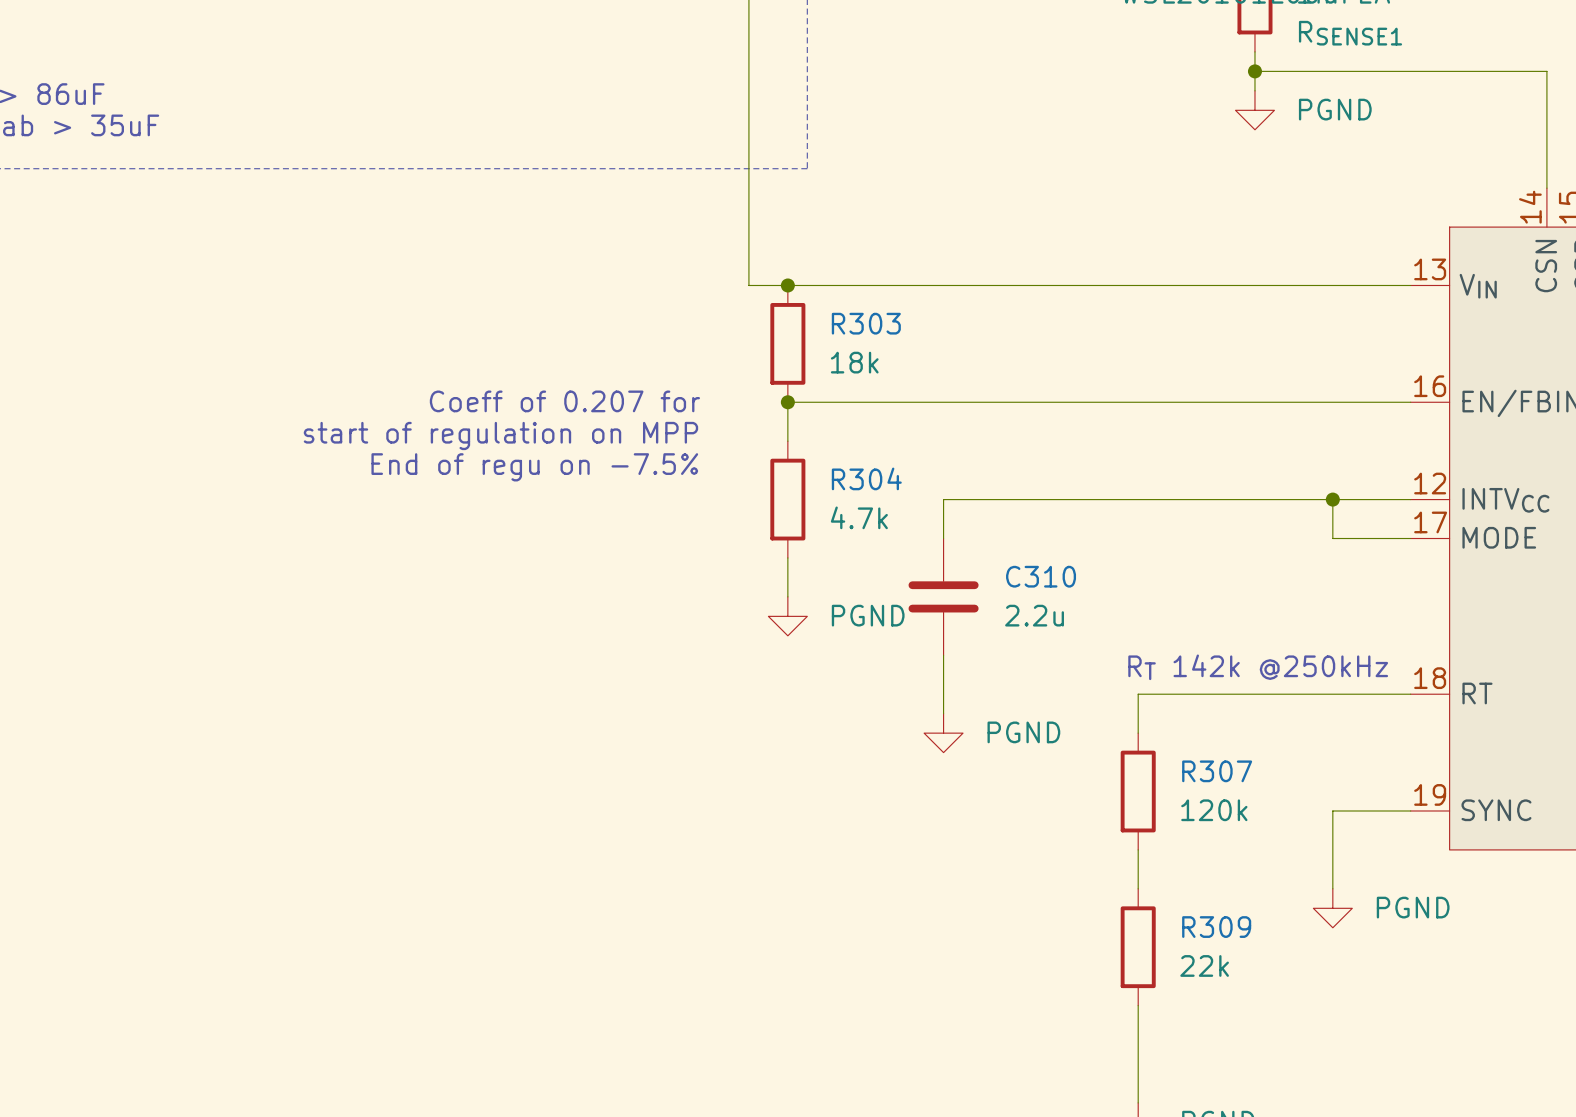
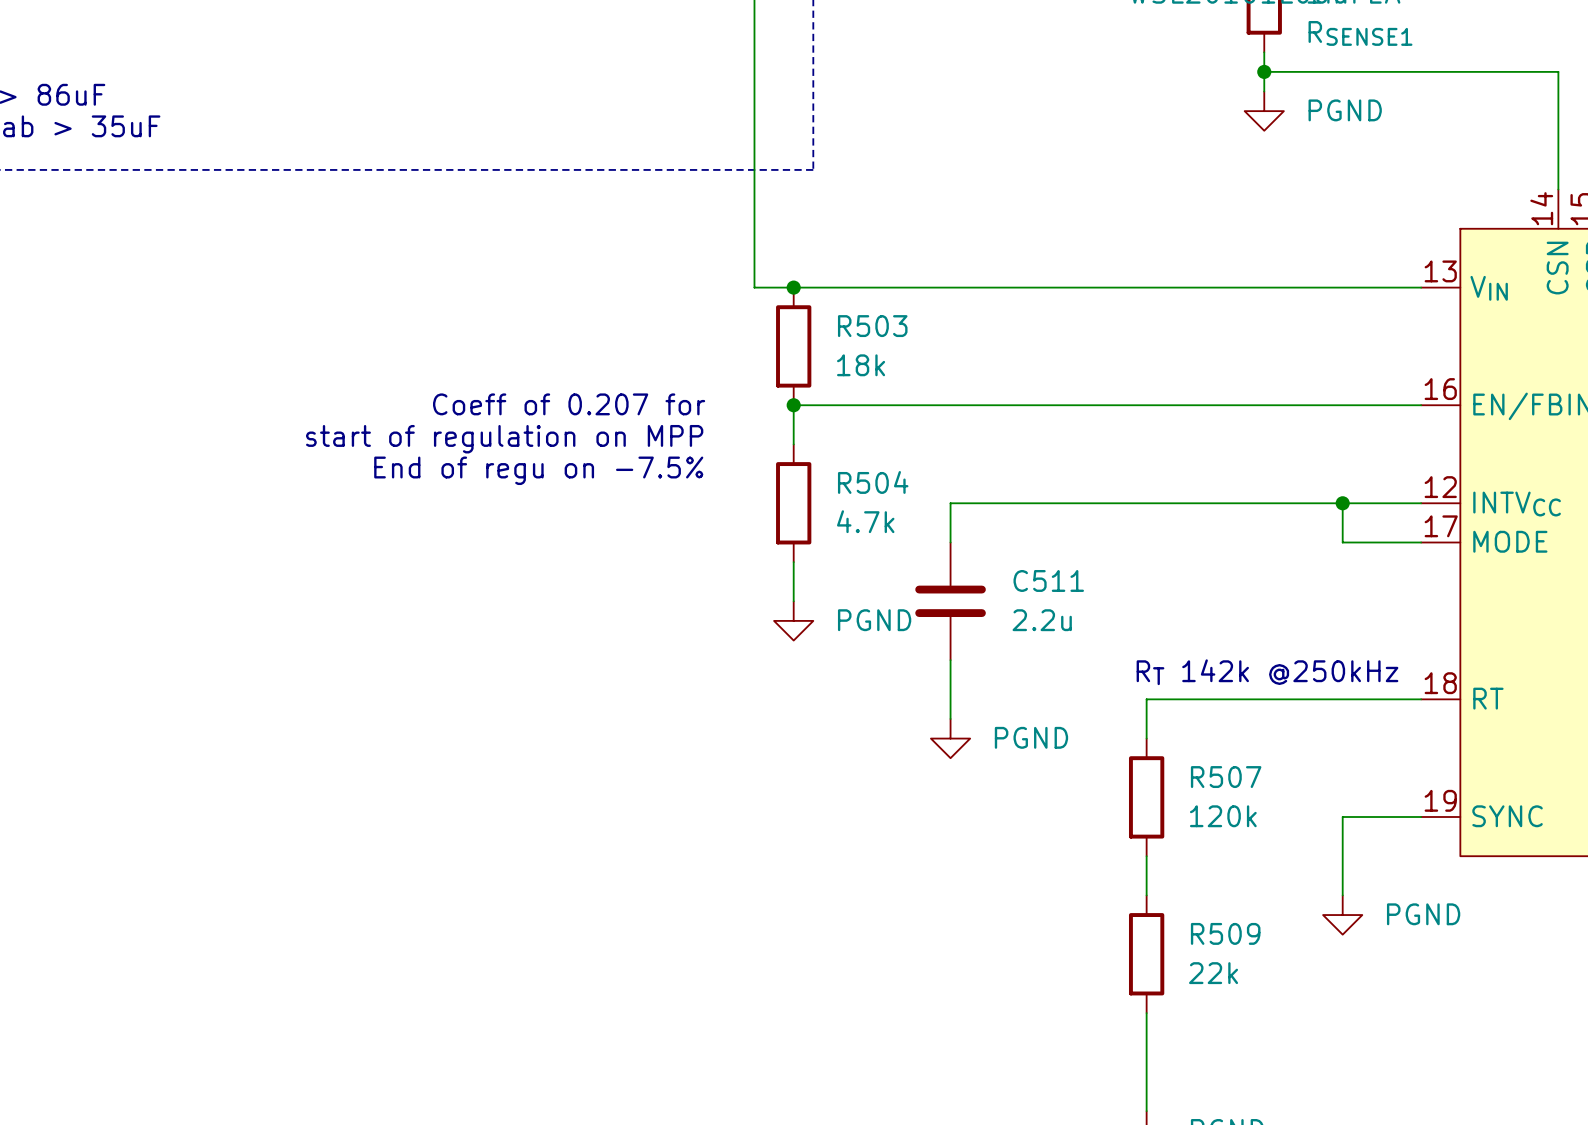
R303 name: R303 (866, 323) -> R503 (872, 326)
R304 name: R304 (866, 478) -> R504 (873, 482)
C310 name: C310 (1041, 576) -> C511 (1048, 580)
R307 name: R307 (1217, 771) -> R507 (1226, 777)
R309 name: R309 (1216, 927) -> R509 (1225, 933)

